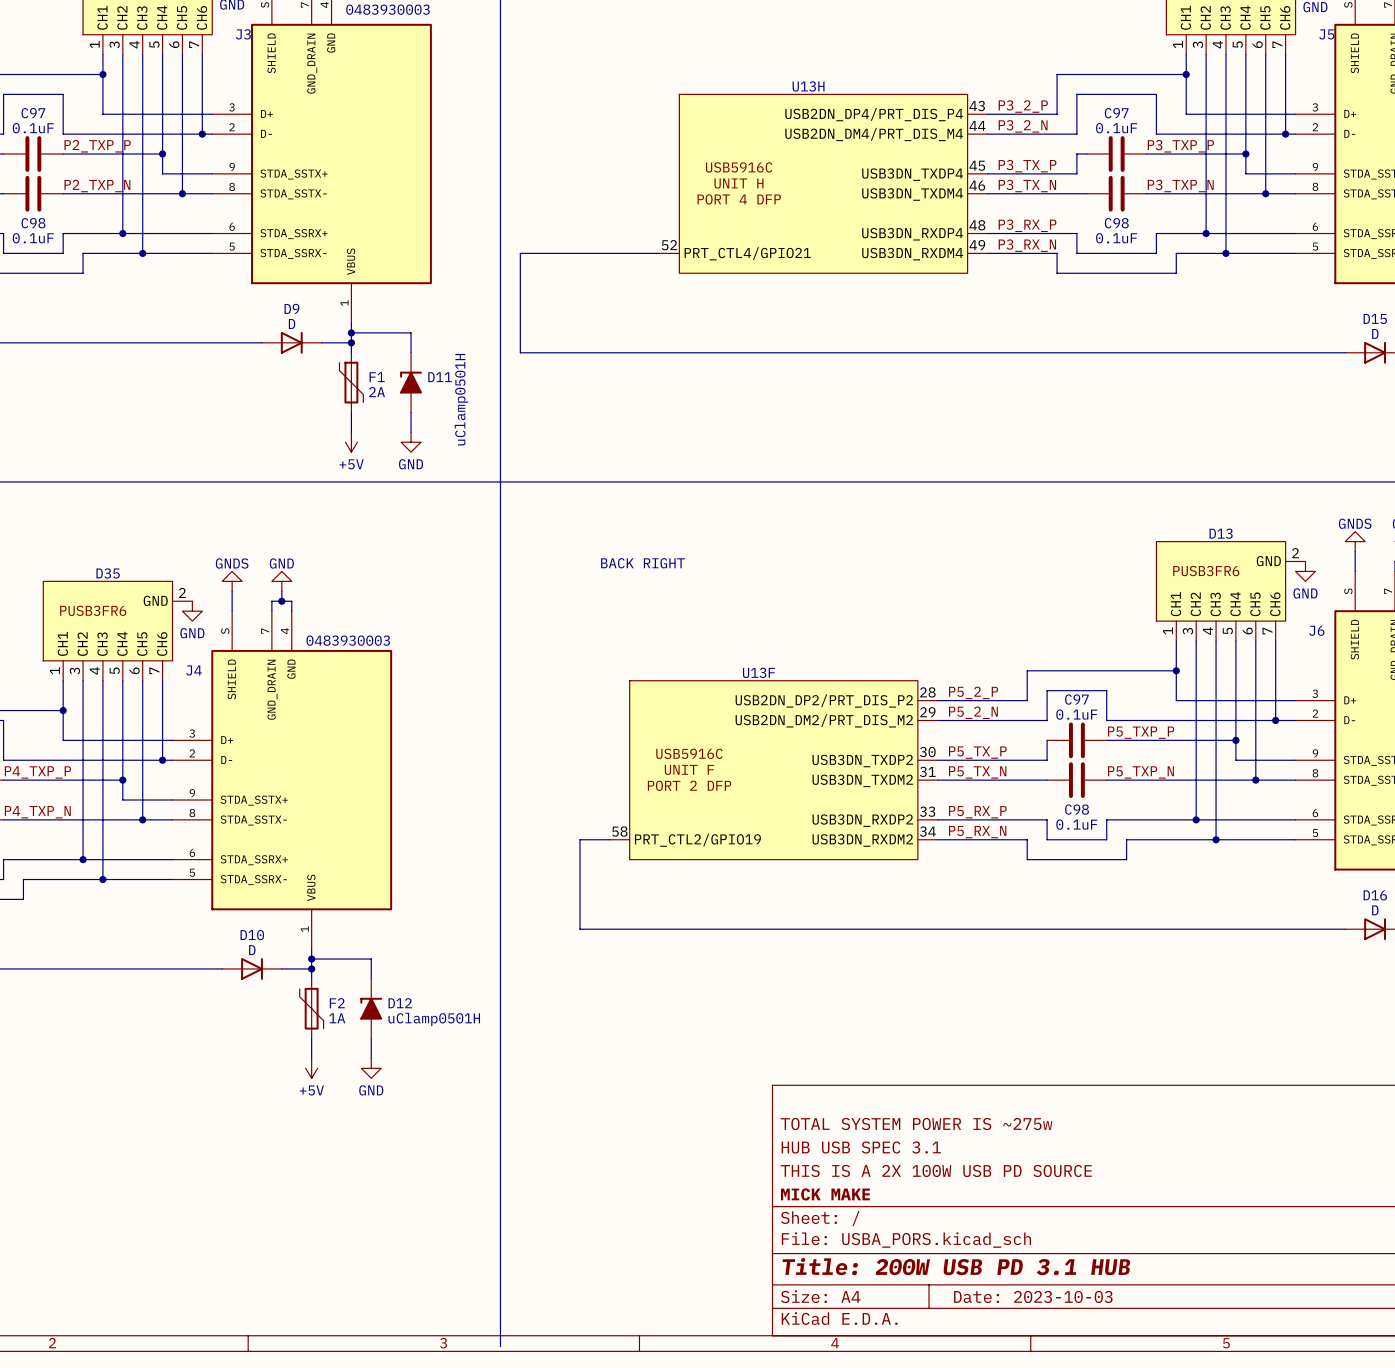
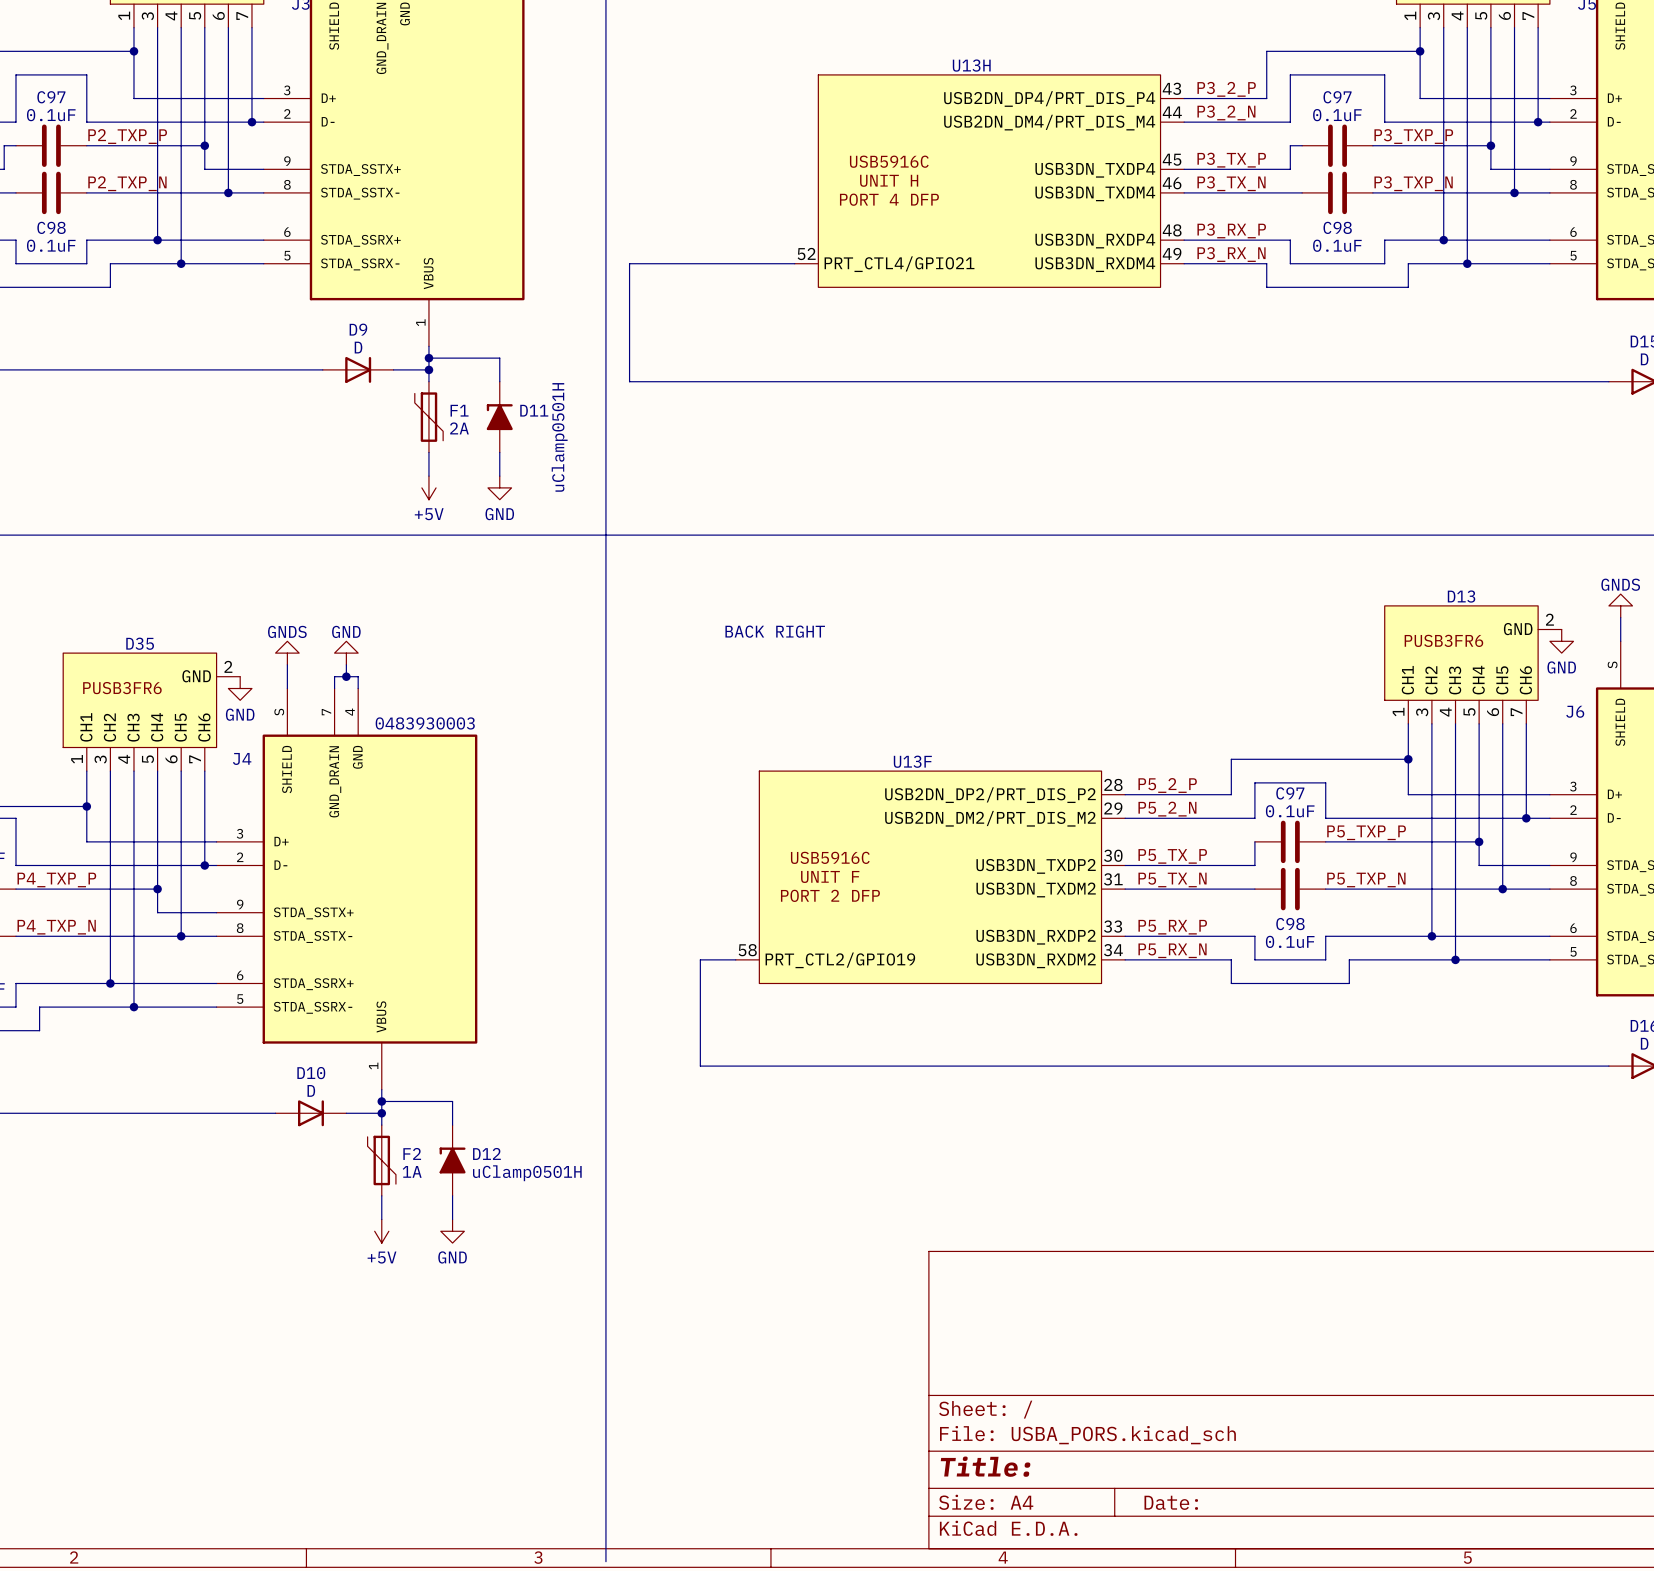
title block: TOTAL SYSTEM POWER IS ~275w (916, 1124) -> none
title block: HUB USB SPEC 3.1 (861, 1147) -> none
title block: THIS IS A 2X 100W USB PD SOURCE (936, 1170) -> none
title block: MICK MAKE (825, 1194) -> none
title block: Title: 200W USB PD 3.1 HUB (956, 1266) -> Title: (985, 1466)
title block: Date: 2023-10-03 (1033, 1296) -> Date: (1171, 1502)

